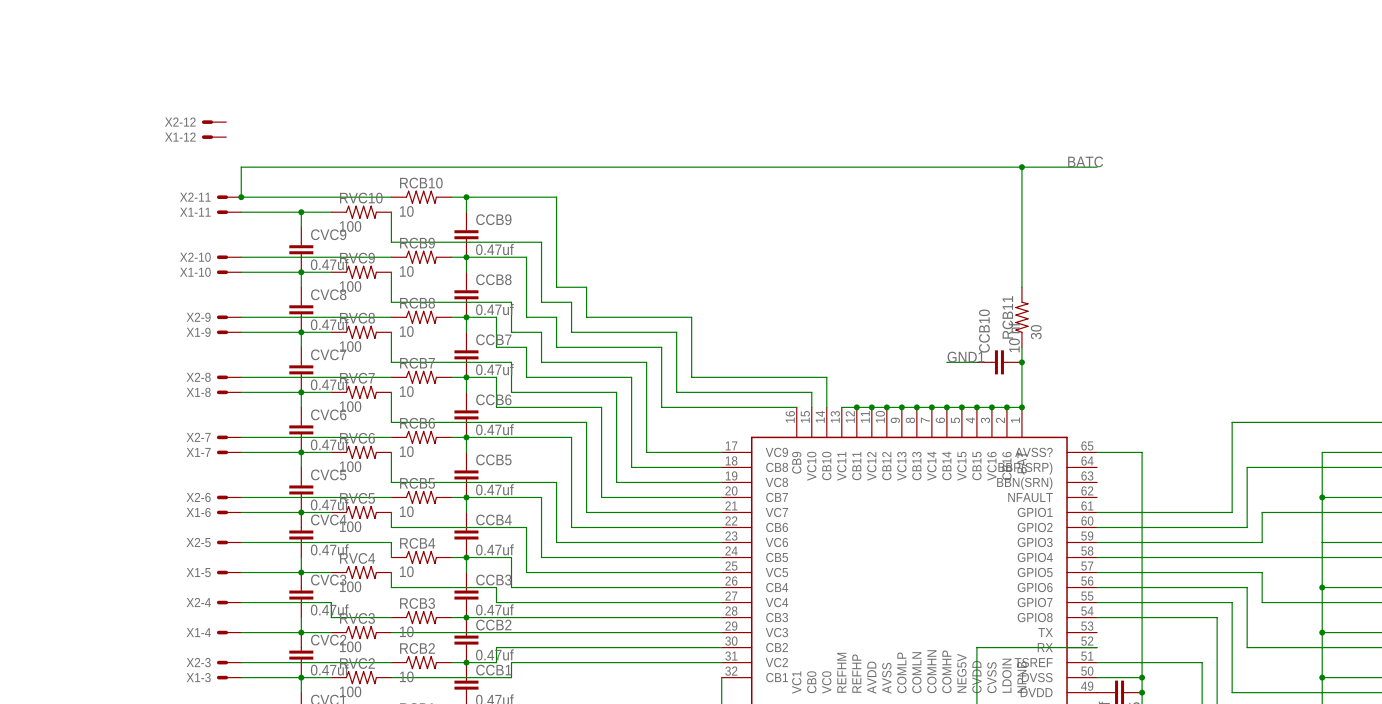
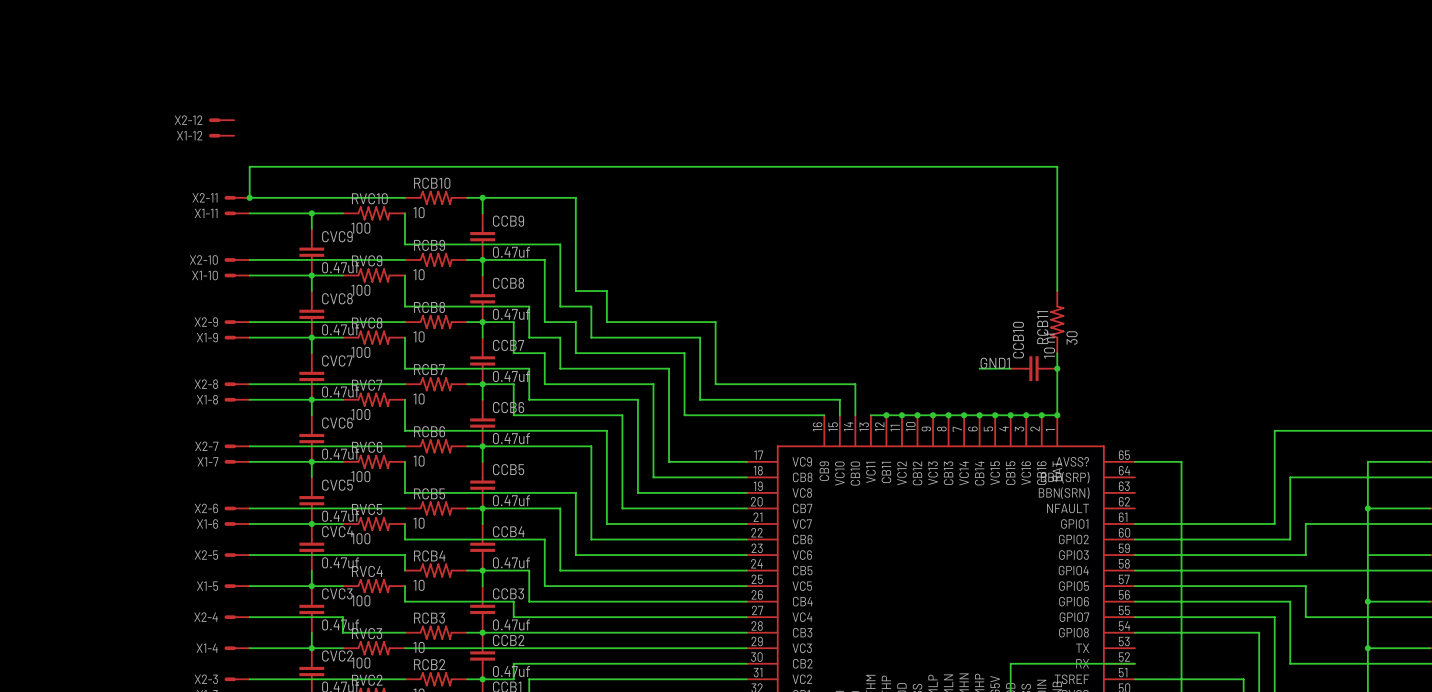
label: BATC (1085, 161) -> none
wire: (1021, 167) (1097, 167) -> none
junction: (1021, 167) -> none

